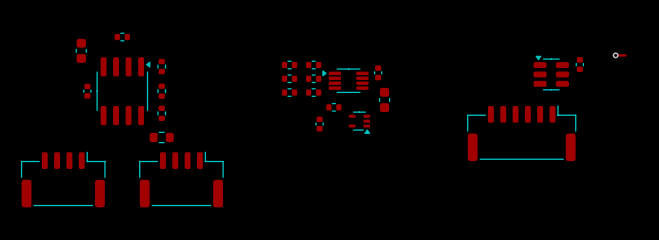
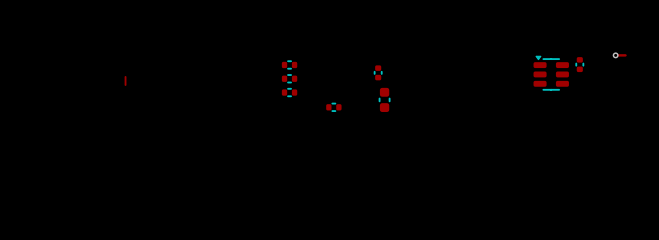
part: (122, 37) -> none
part: (81, 50) -> none
part: (313, 64) -> none
part: (161, 66) -> none
track: none -> (125, 76) (125, 85)
part: (313, 78) -> none
part: (345, 80) -> none
part: (87, 91) -> none
part: (123, 91) -> none
part: (161, 91) -> none
part: (313, 92) -> none
part: (161, 113) -> none
part: (359, 122) -> none
part: (319, 124) -> none
part: (521, 133) -> none
part: (161, 137) -> none
part: (63, 179) -> none
part: (181, 179) -> none

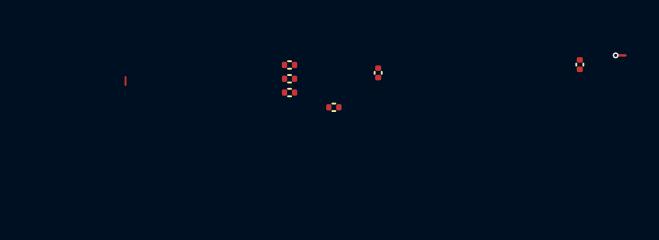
part: (551, 73) -> none
part: (384, 99) -> none

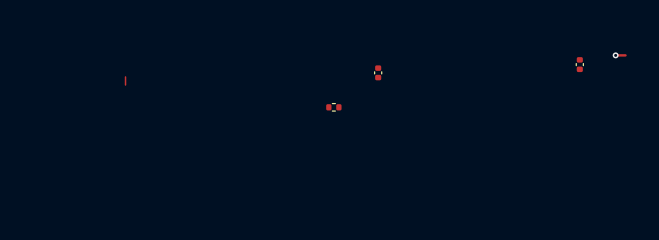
part: (289, 64) -> none
part: (289, 78) -> none
part: (289, 92) -> none

